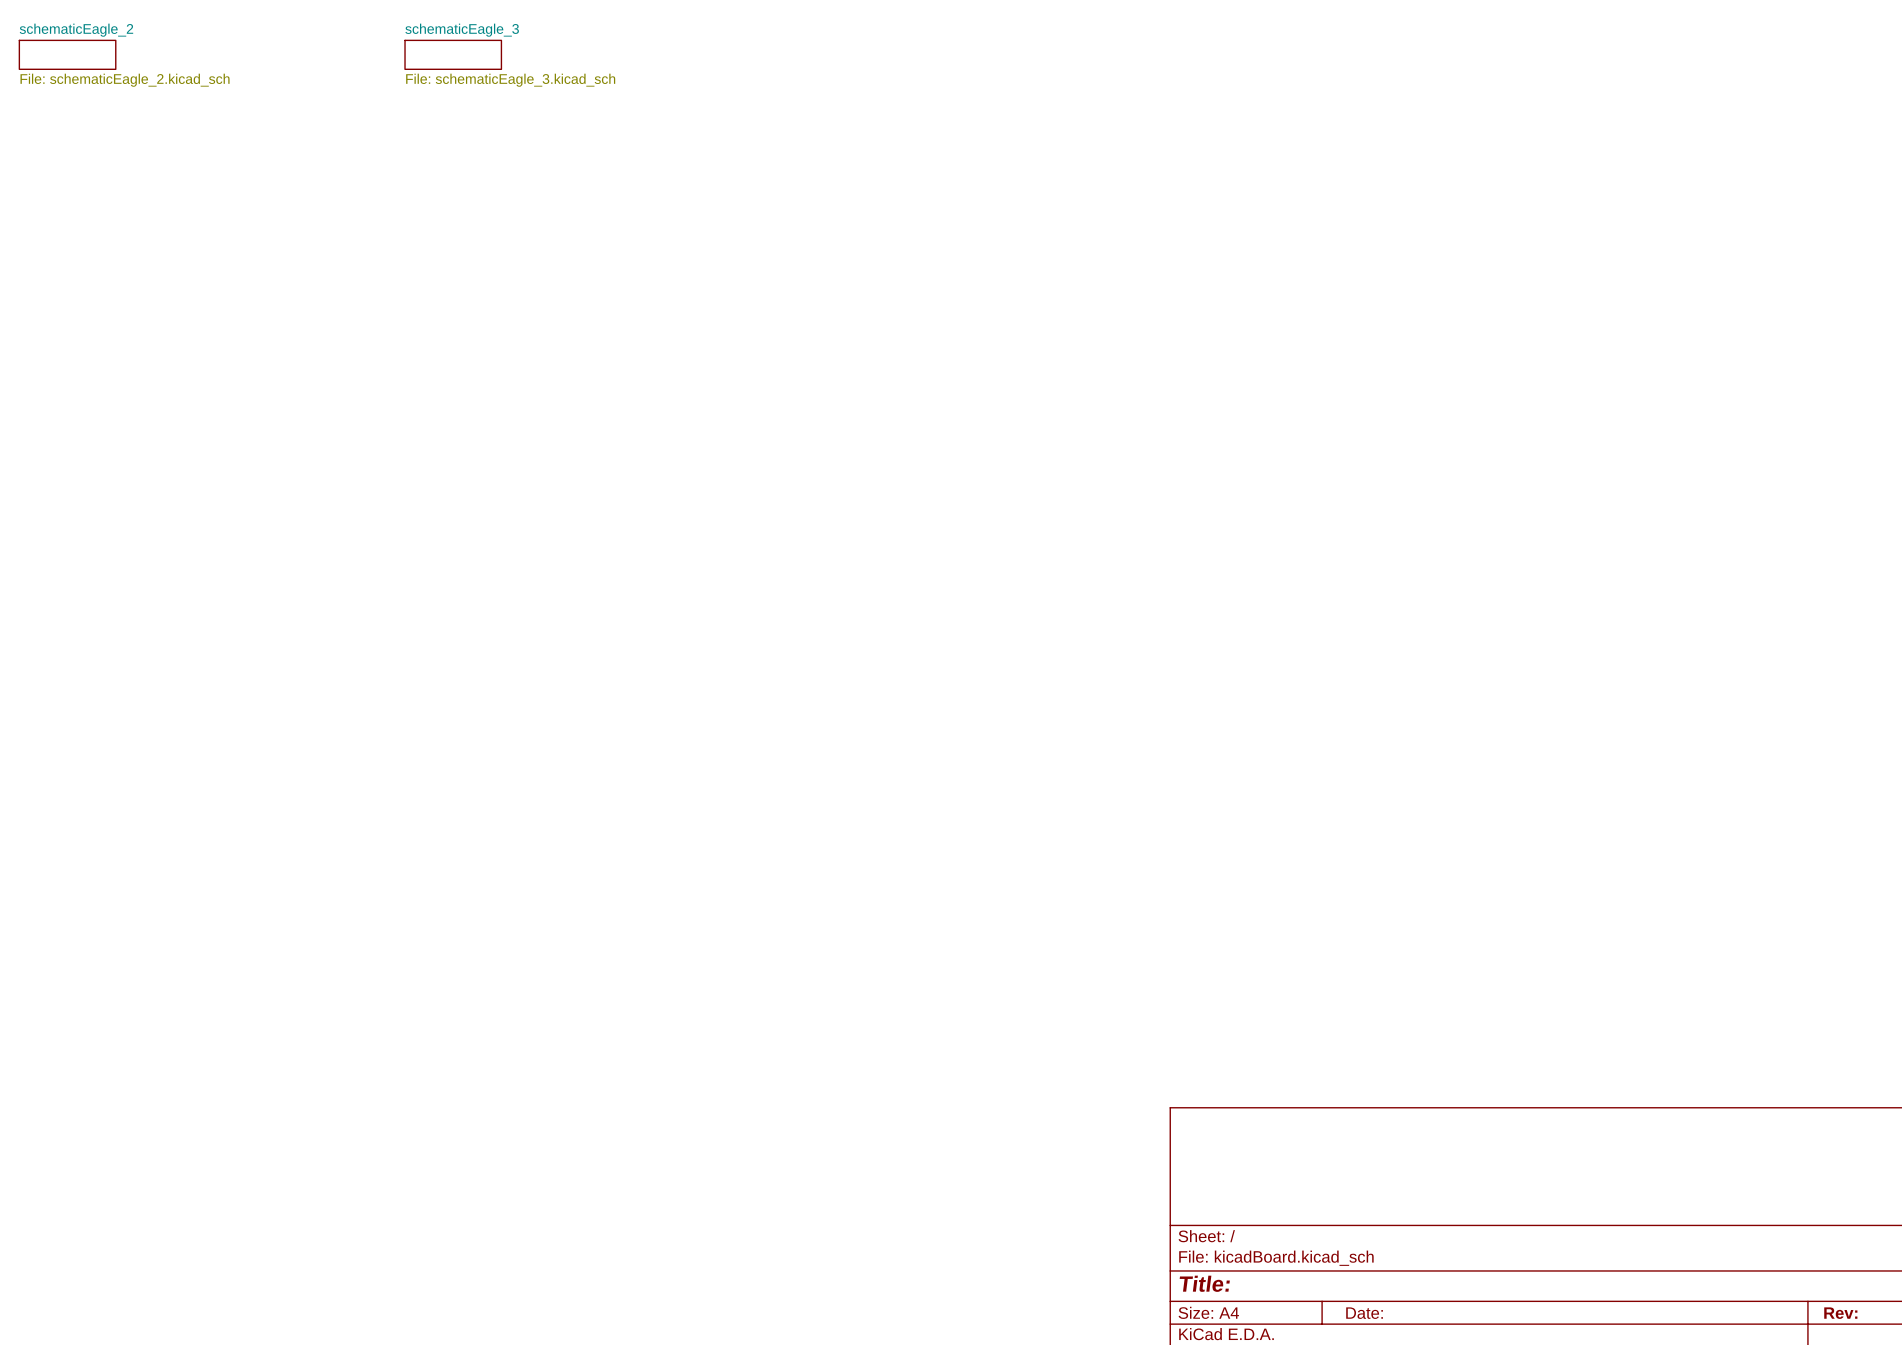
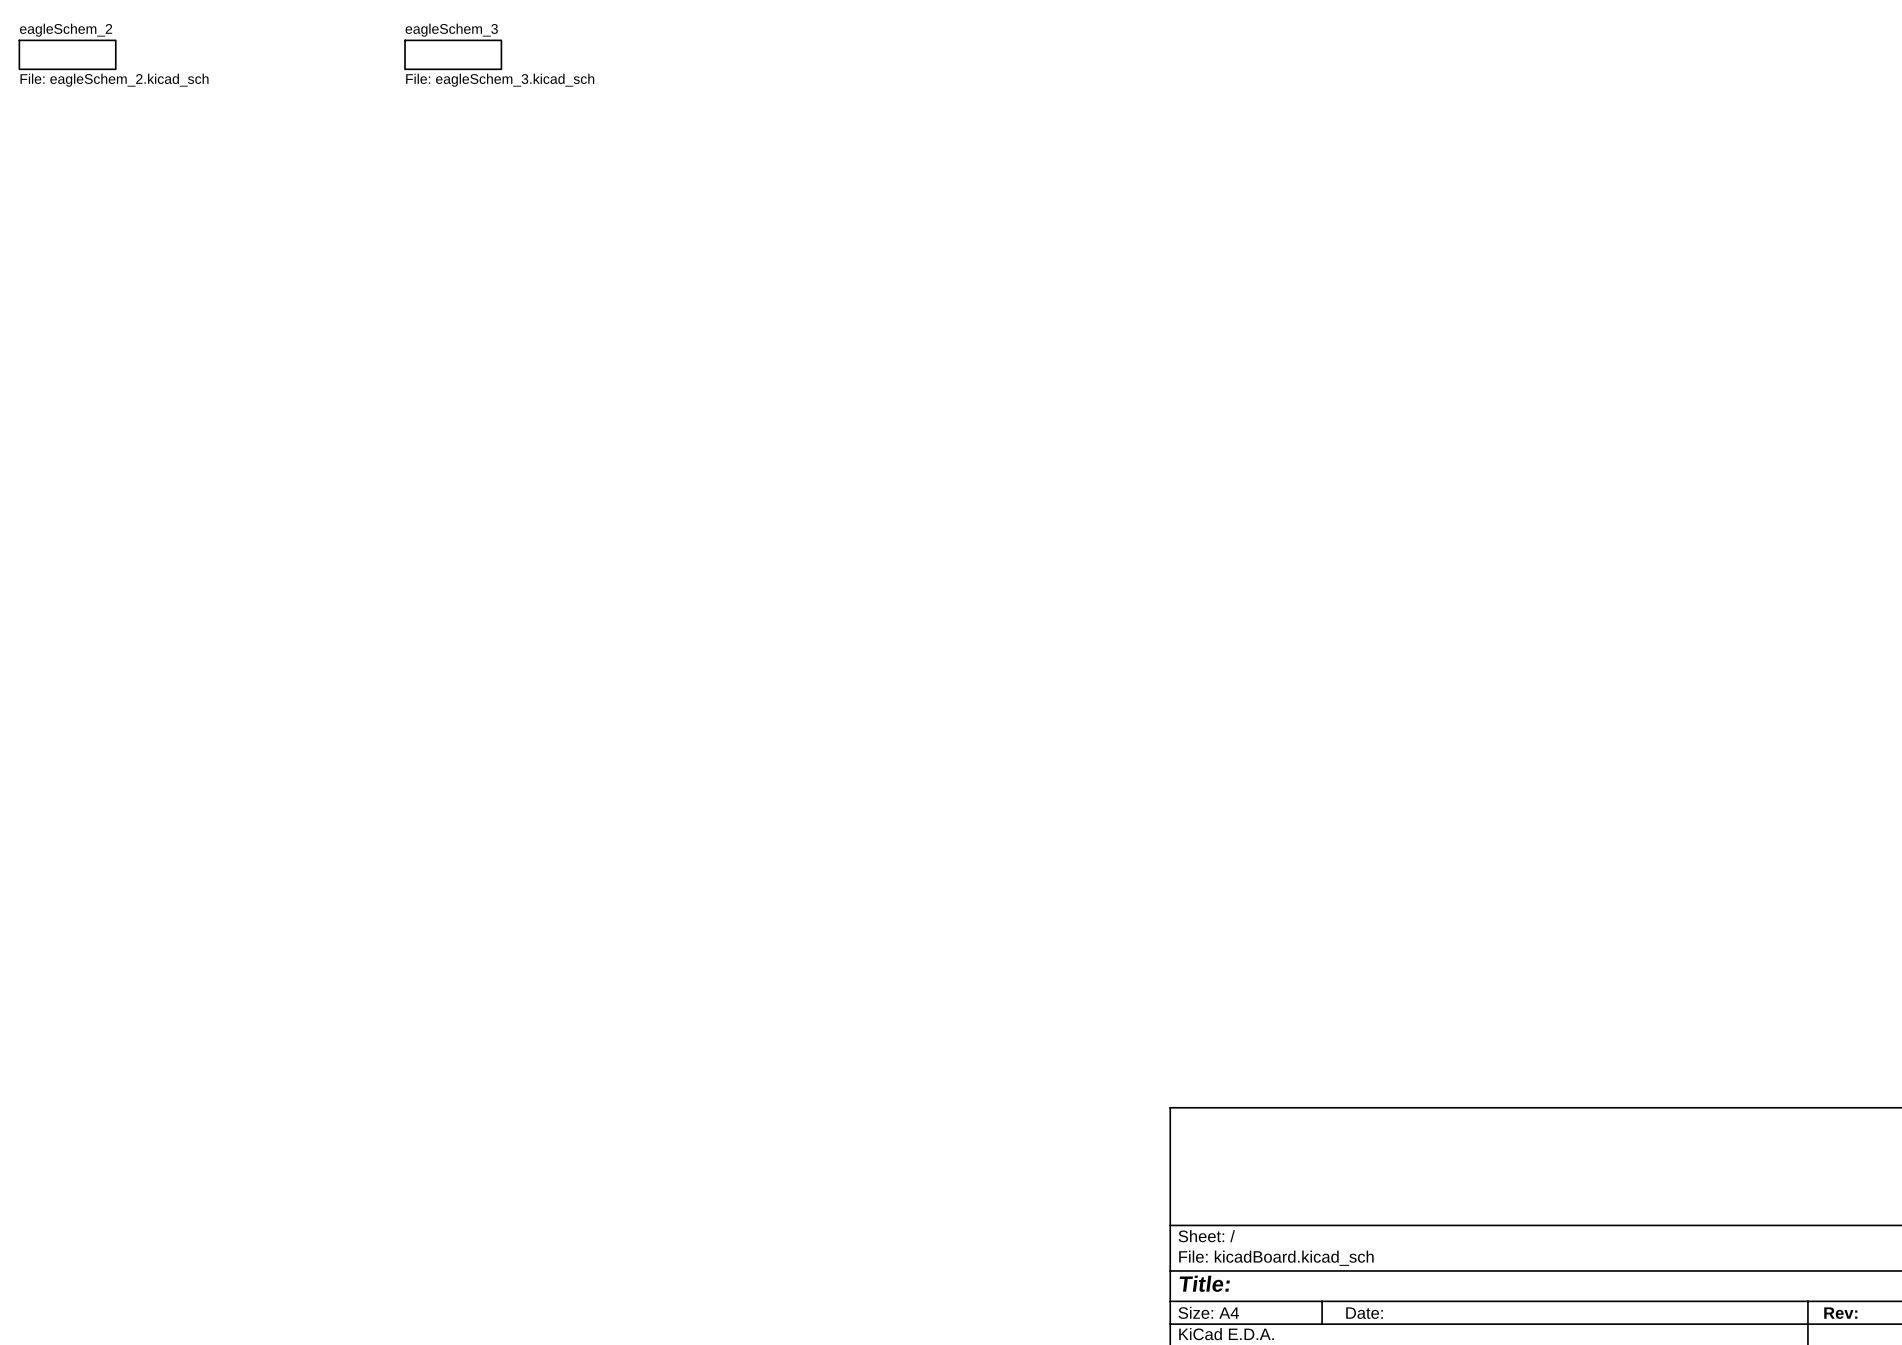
sheet schematicEagle_2 name: schematicEagle_2 (76, 30) -> eagleSchem_2 (66, 30)
sheet schematicEagle_3 name: schematicEagle_3 (462, 30) -> eagleSchem_3 (451, 30)
sheet schematicEagle_2 value: File: schematicEagle_2.kicad_sch (125, 80) -> File: eagleSchem_2.kicad_sch (114, 80)
sheet schematicEagle_3 value: File: schematicEagle_3.kicad_sch (510, 80) -> File: eagleSchem_3.kicad_sch (500, 80)

